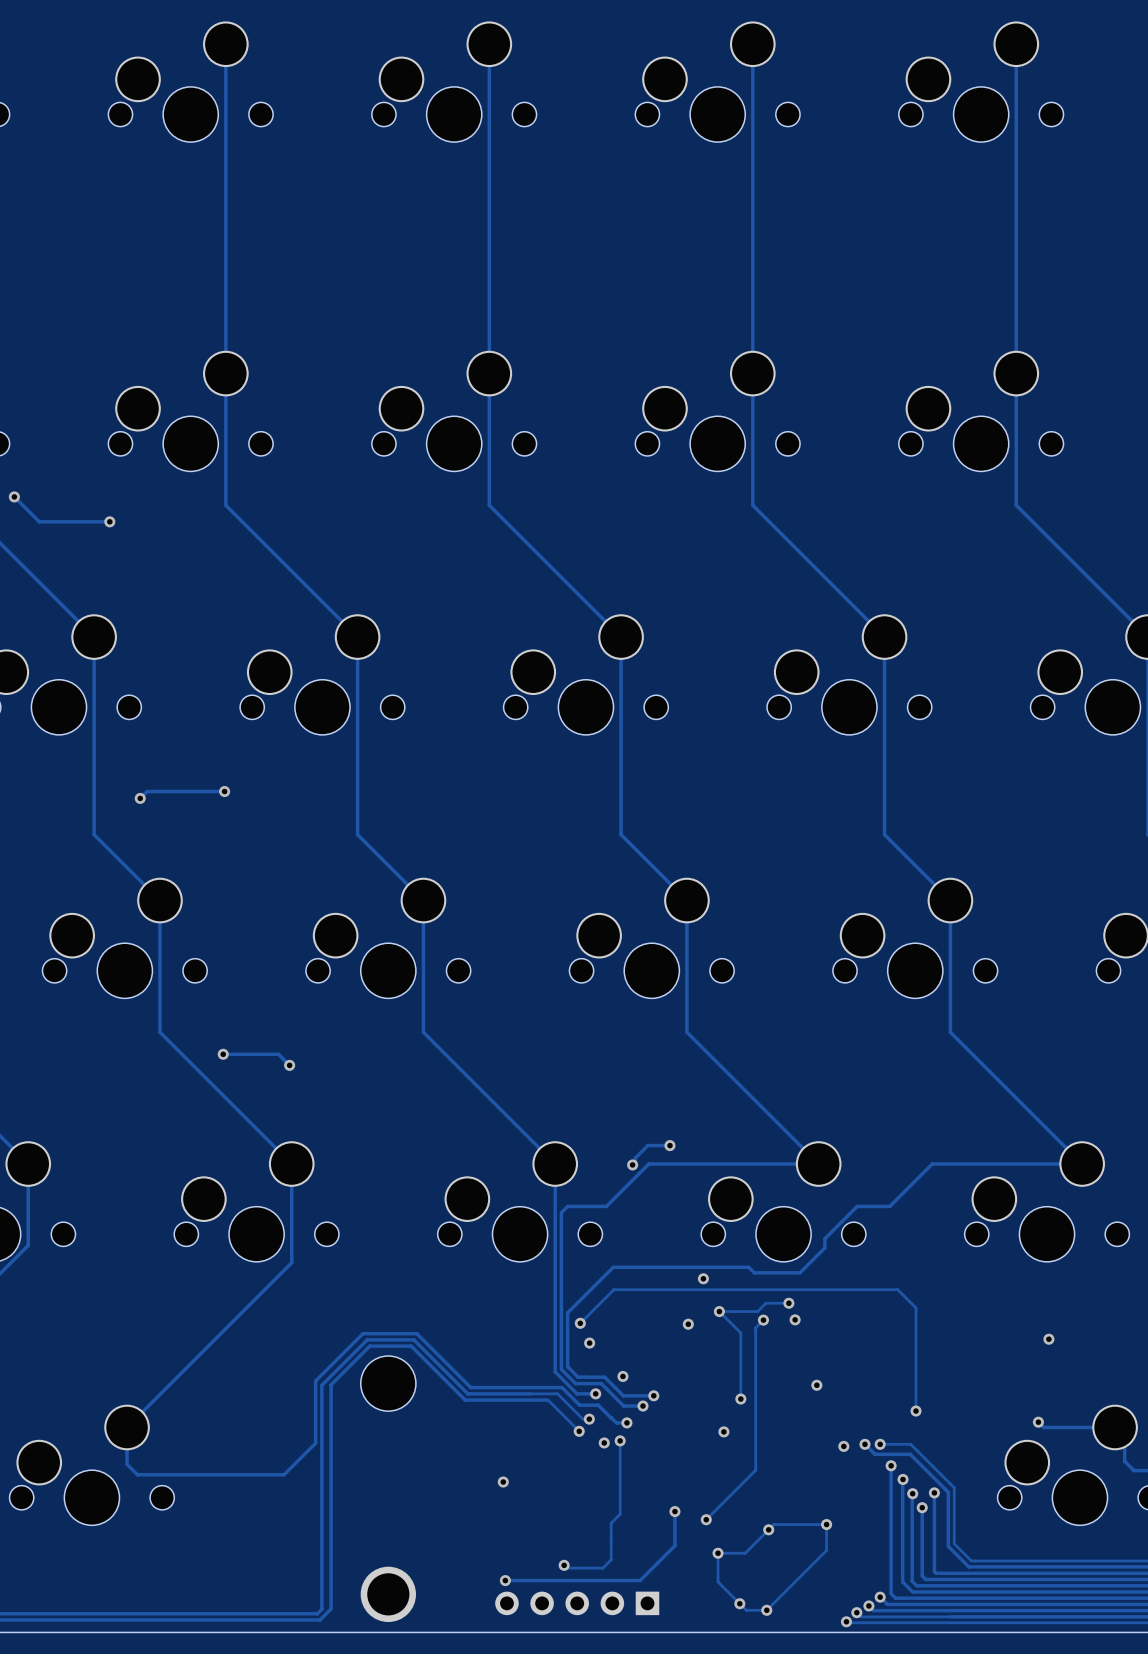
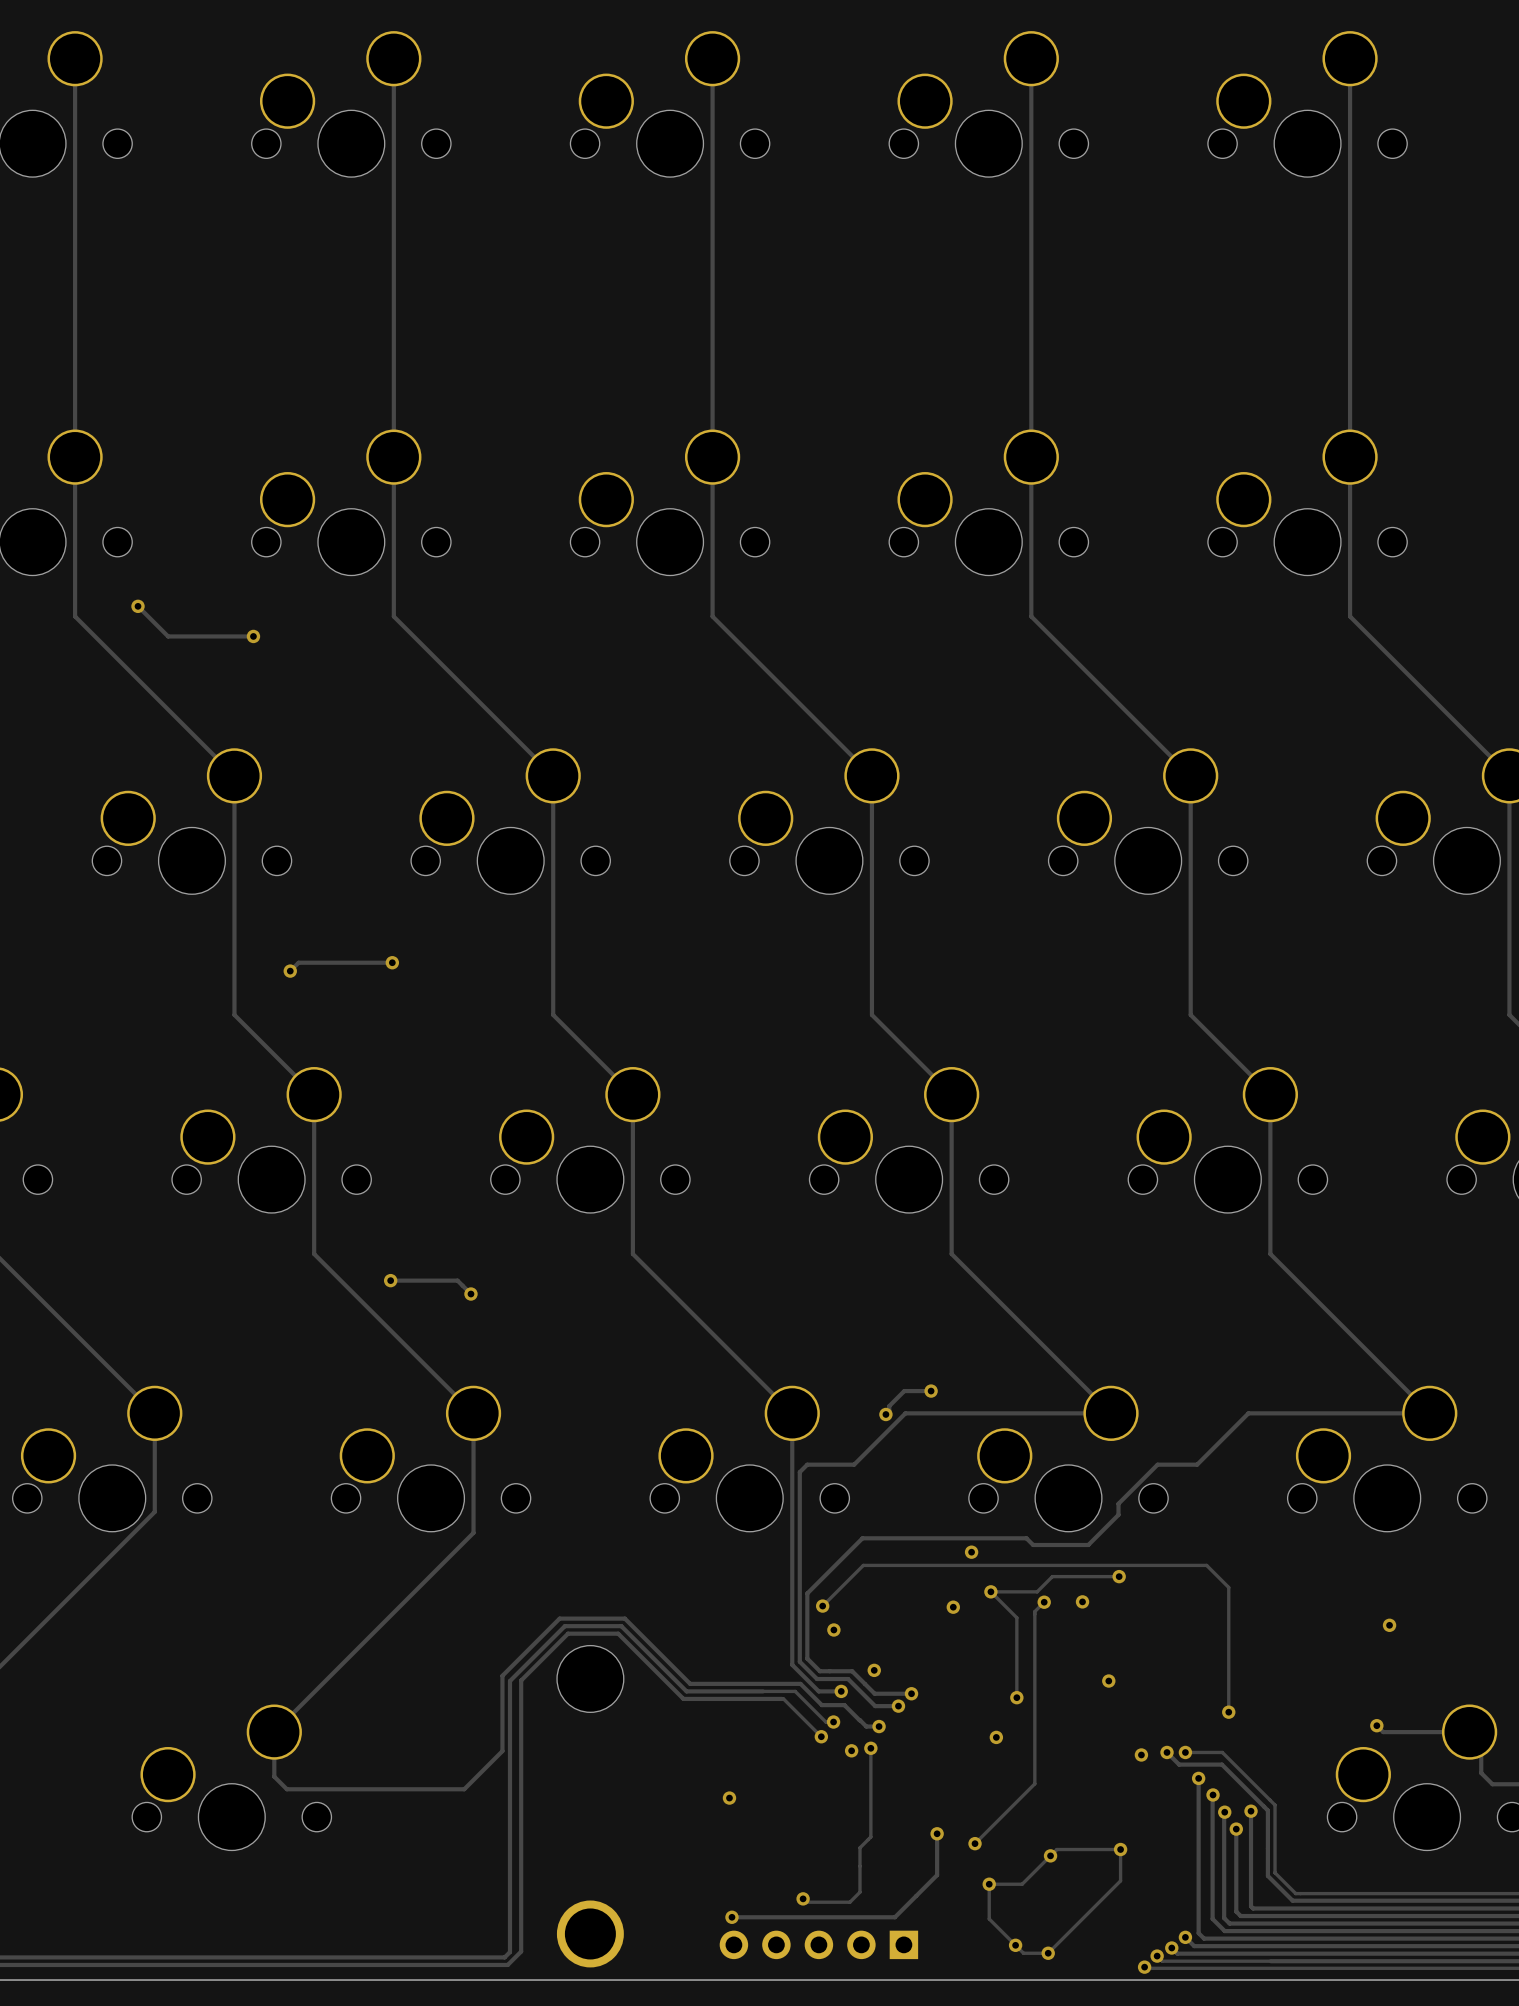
track: (765, 1303) (788, 1303) -> (1047, 1581) (1052, 1576) (1119, 1576)
via position: (788, 1303) -> (1119, 1576)

